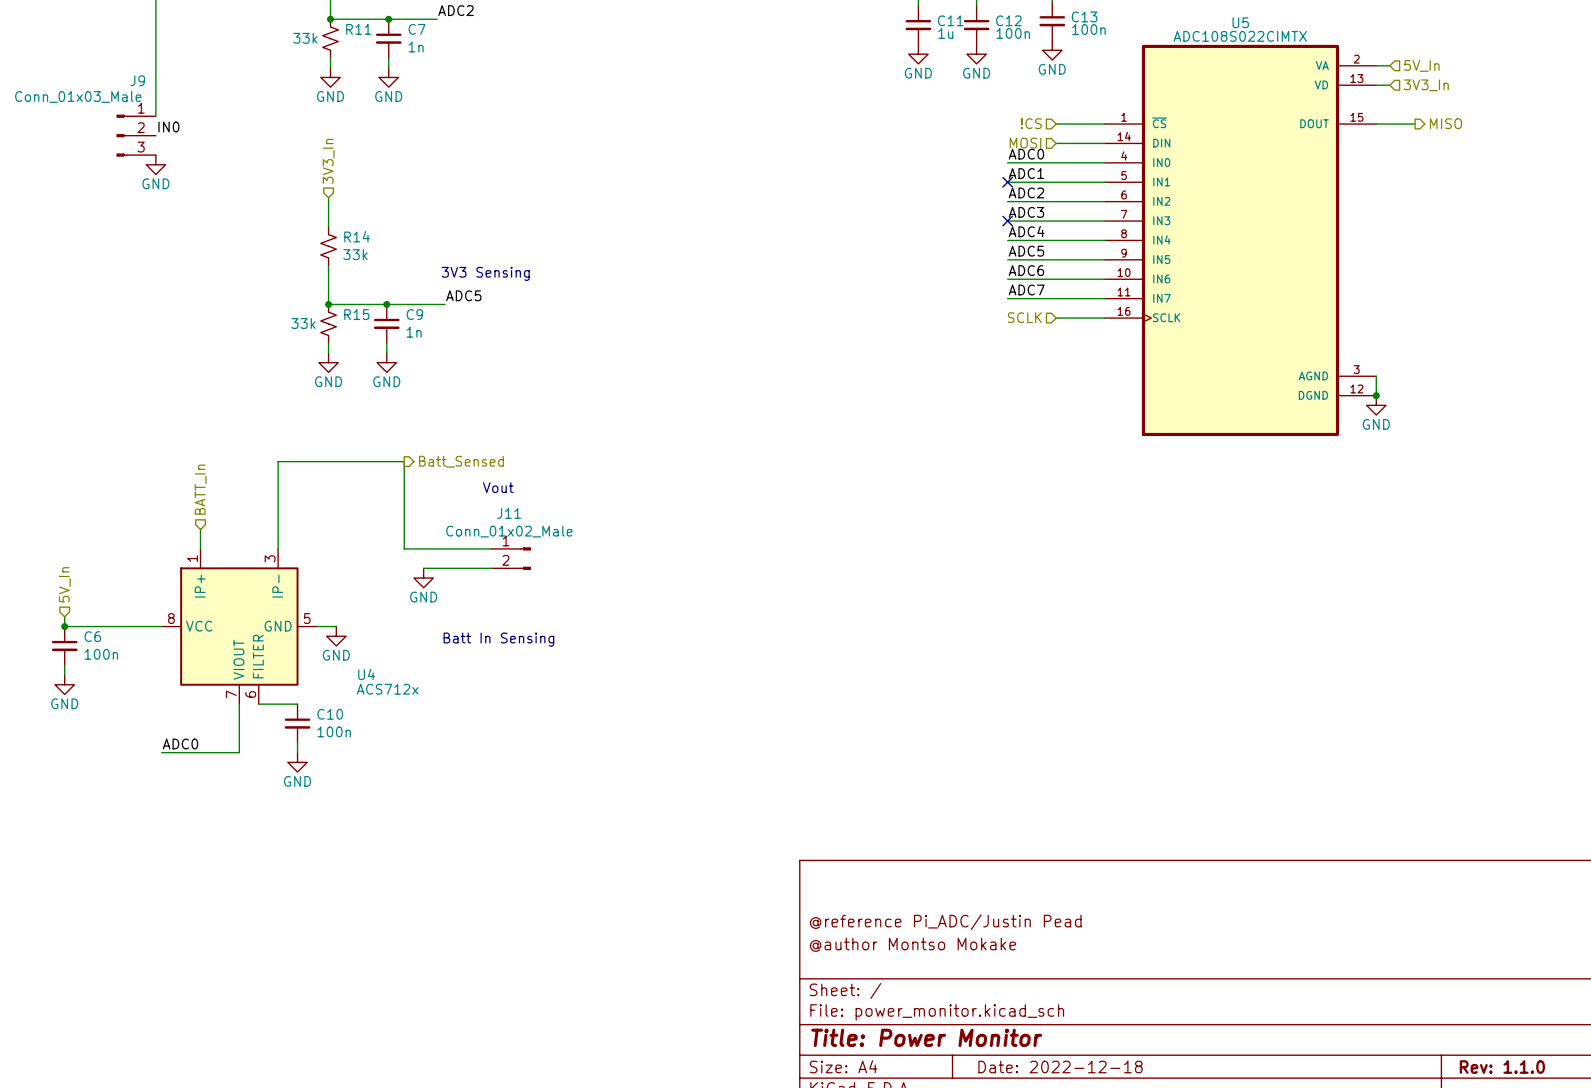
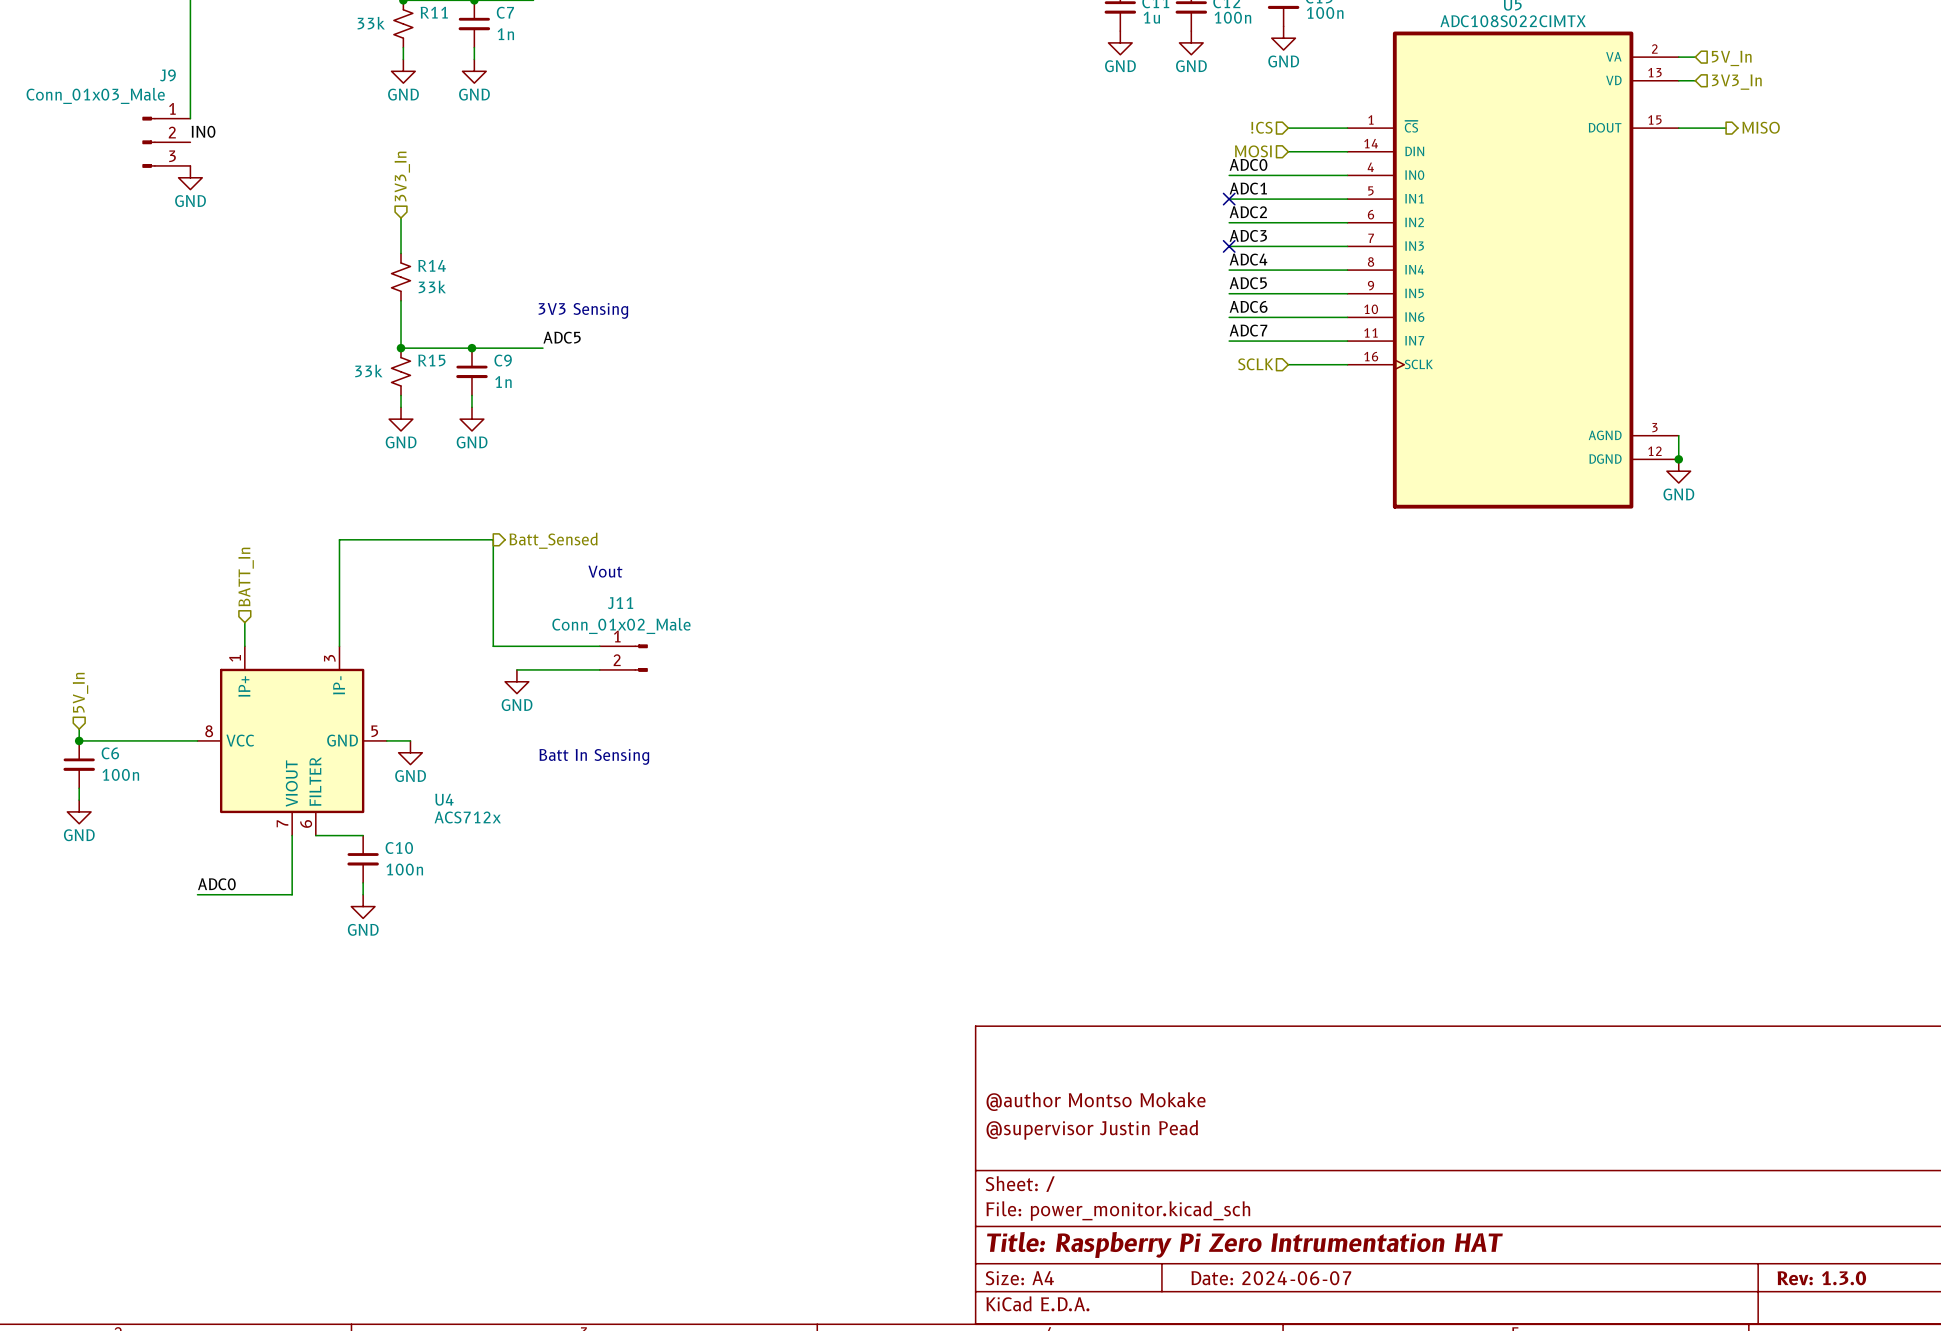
title block: @reference Pi_ADC/Justin Pead (945, 922) -> @author Montso Mokake (1096, 1101)
title block: @author Montso Mokake (912, 944) -> @supervisor Justin Pead (1092, 1129)
title block: Title: Power Monitor (926, 1037) -> Title: Raspberry Pi Zero Intrumentation HAT (1244, 1244)
title block: Date: 2022-12-18 (1060, 1067) -> Date: 2024-06-07 (1271, 1278)
title block: Rev: 1.1.0 (1502, 1067) -> Rev: 1.3.0 (1821, 1278)

